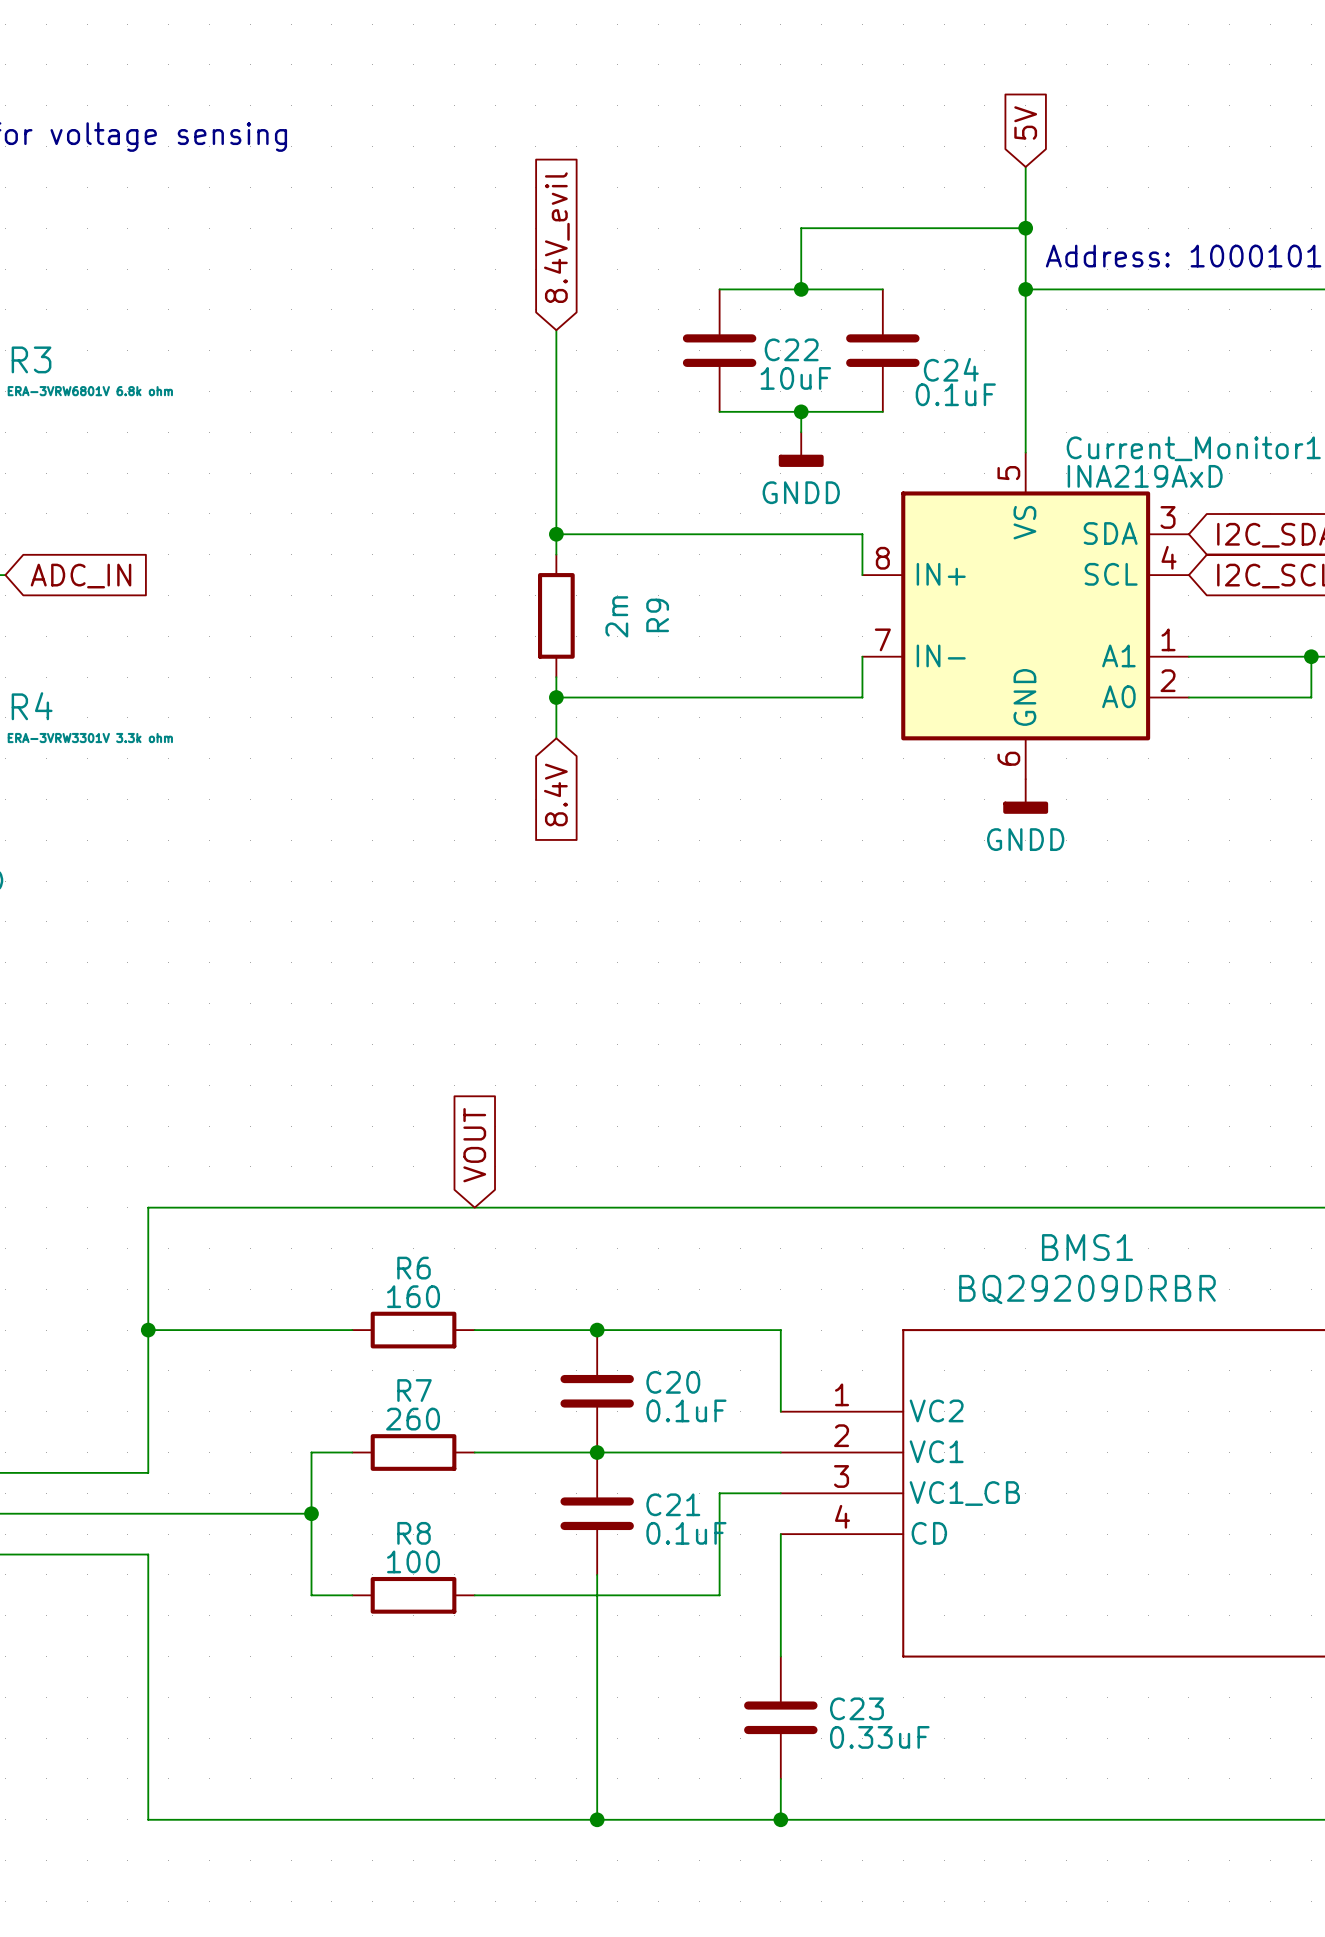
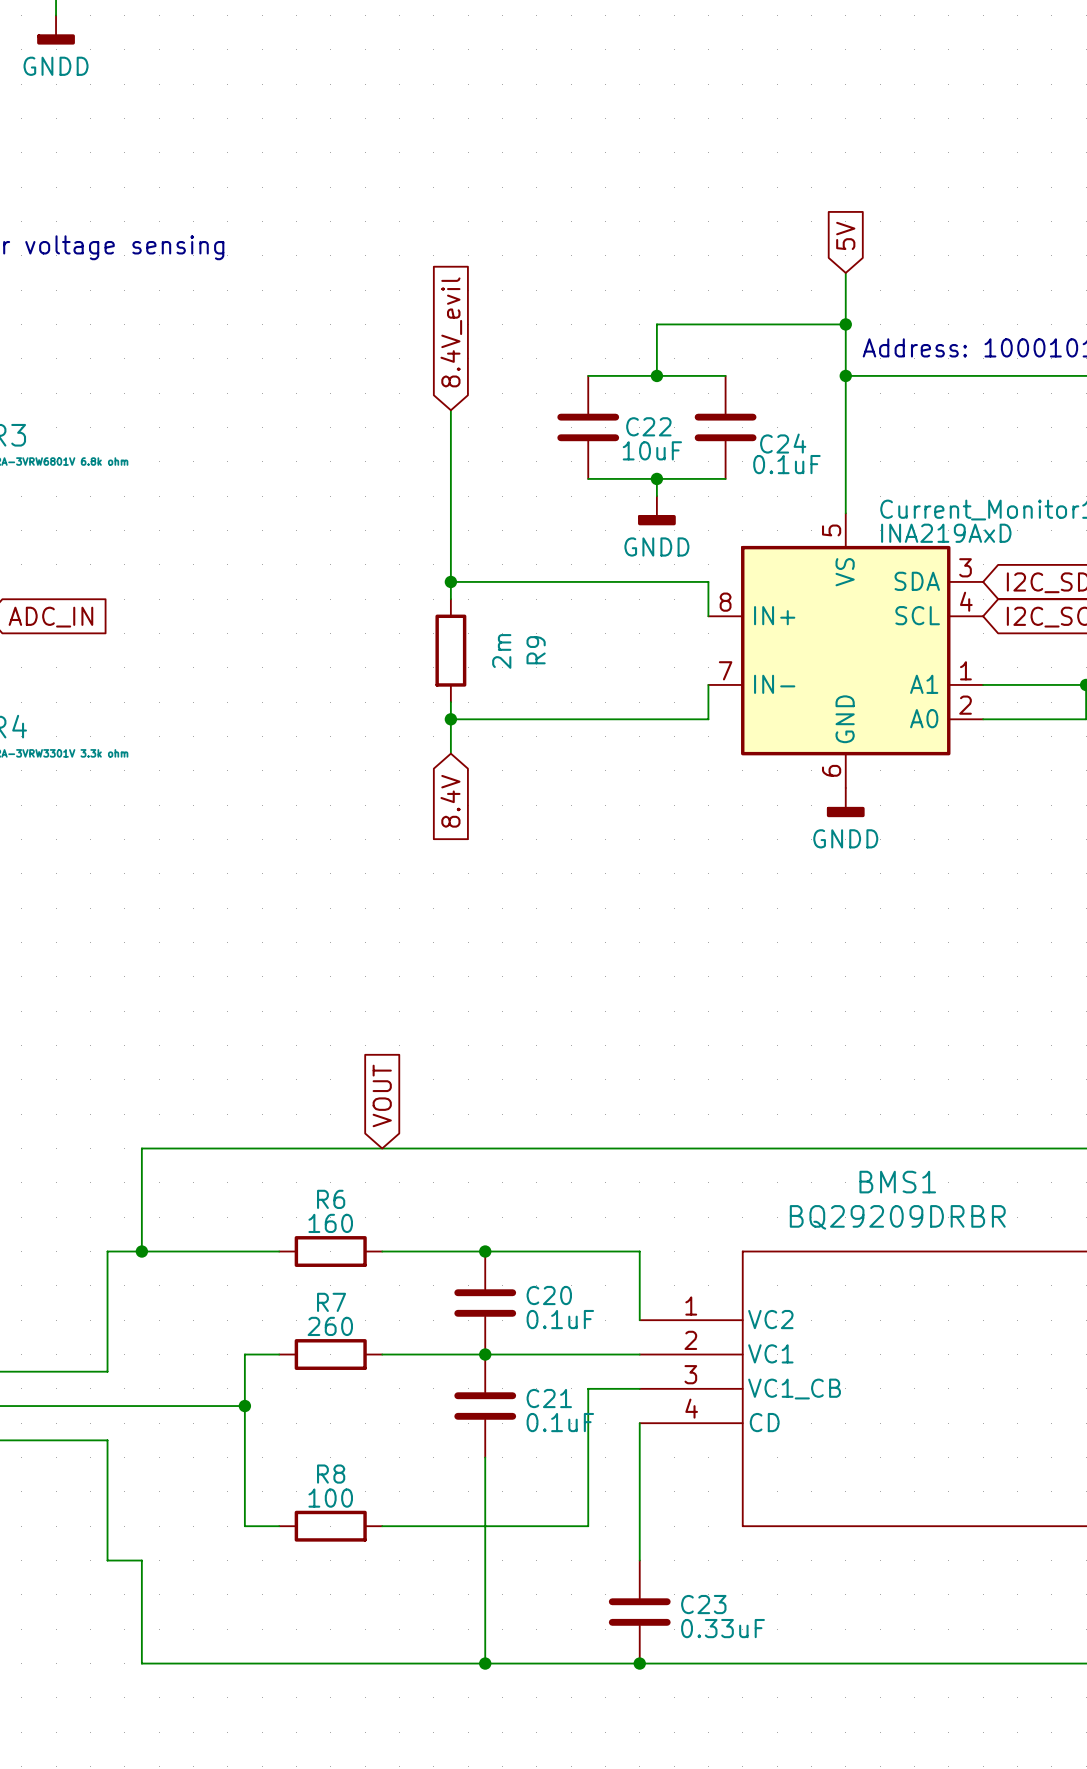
wire: (189, 1207) (148, 1207) (148, 1330) -> (141, 1148) (141, 1251)
junction position: (148, 1330) -> (141, 1251)
wire: (311, 1595) (352, 1595) -> (244, 1474) (244, 1526) (279, 1526)
R8 position: (413, 1595) -> (330, 1526)
wire: (474, 1595) (719, 1595) -> (382, 1526) (588, 1526) (588, 1474)
wire: (148, 1697) (148, 1819) (189, 1819) -> (107, 1560) (141, 1560) (141, 1663)
C23 position: (780, 1717) -> (639, 1612)

